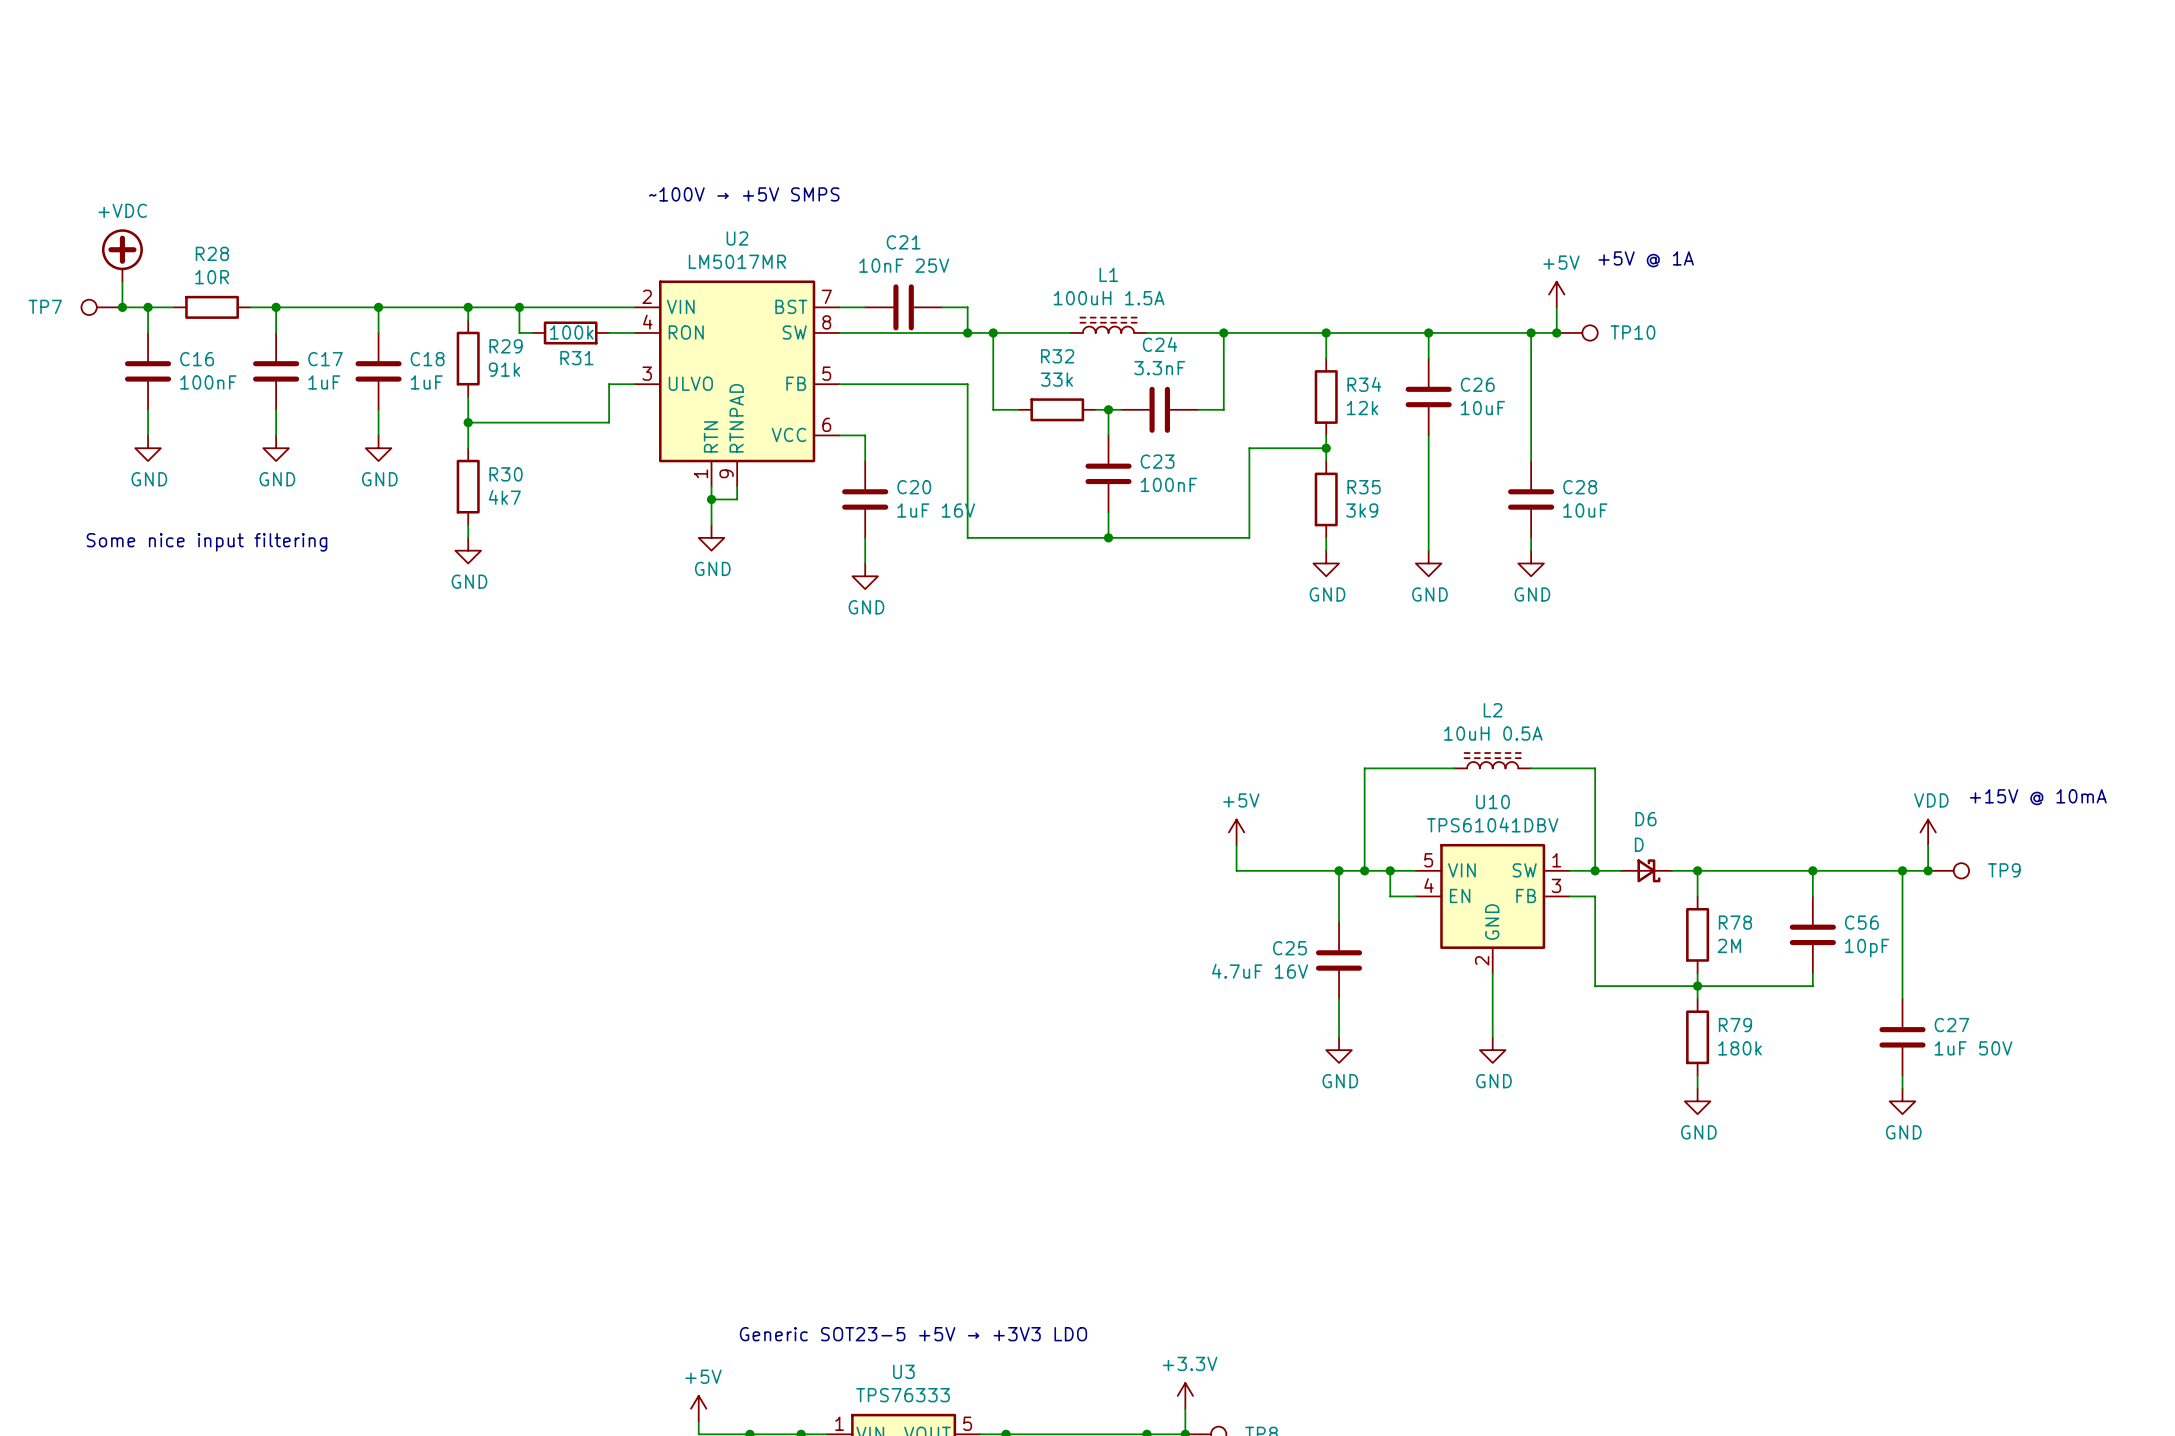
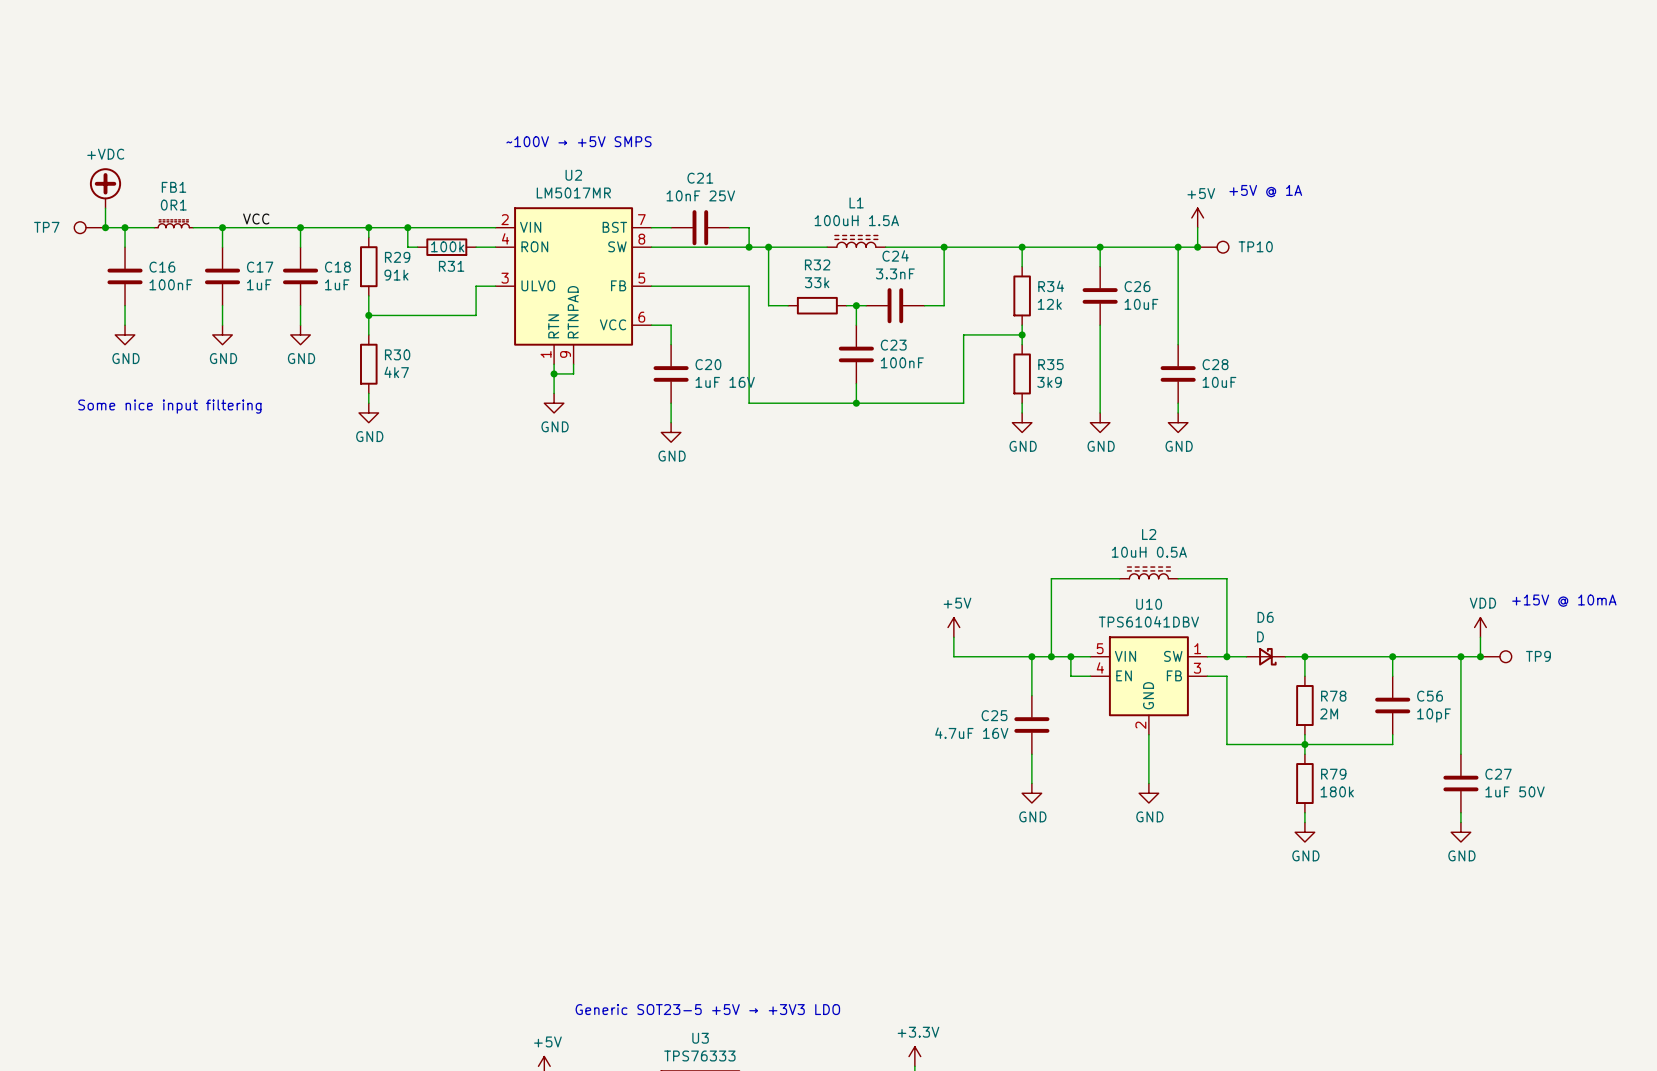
label: none -> VCC (256, 218)
FB1: none -> 0R1 (173, 223)
R28: 10R (212, 307) -> none

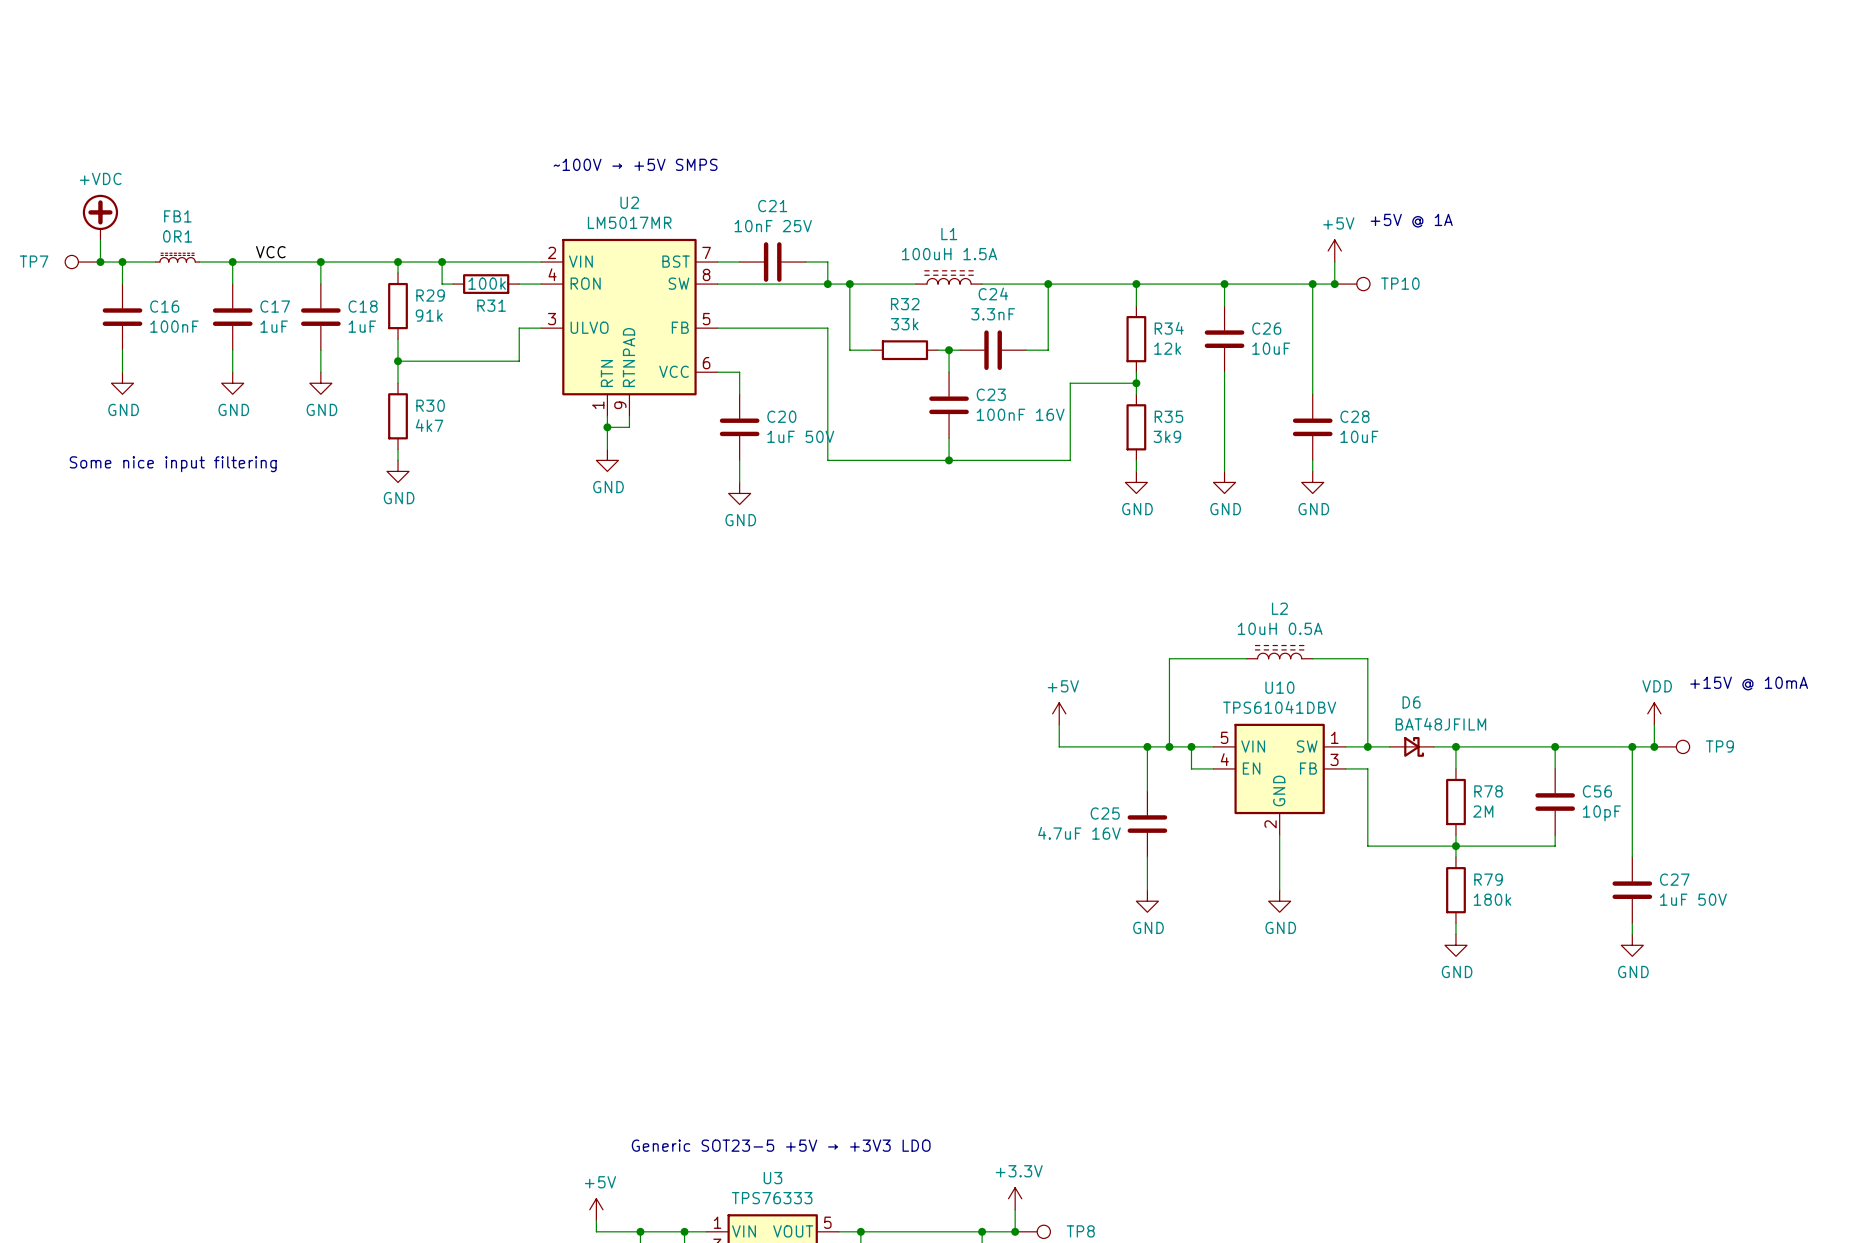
C23 value: 100nF (902, 362) -> 100nF 16V (1020, 414)
C20 value: 1uF 16V (725, 382) -> 1uF 50V (800, 436)
D6 value: D (1260, 636) -> BAT48JFILM (1440, 724)

